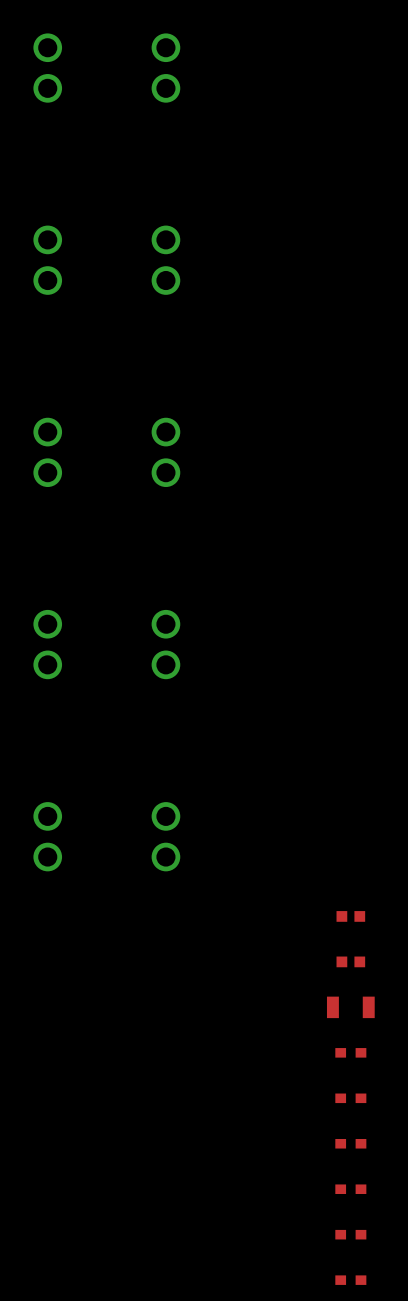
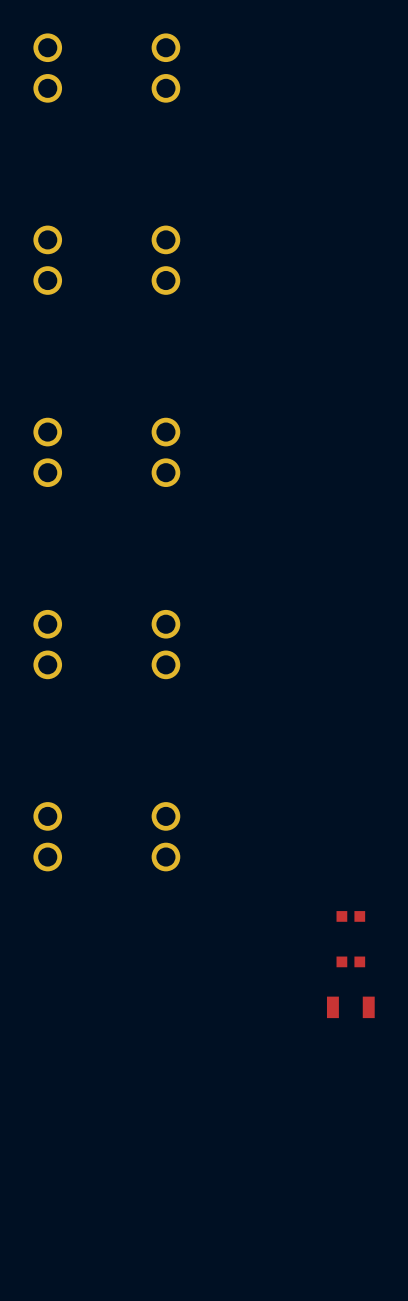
part: (350, 1052) -> none
part: (350, 1098) -> none
part: (350, 1143) -> none
part: (350, 1189) -> none
part: (350, 1234) -> none
part: (350, 1280) -> none

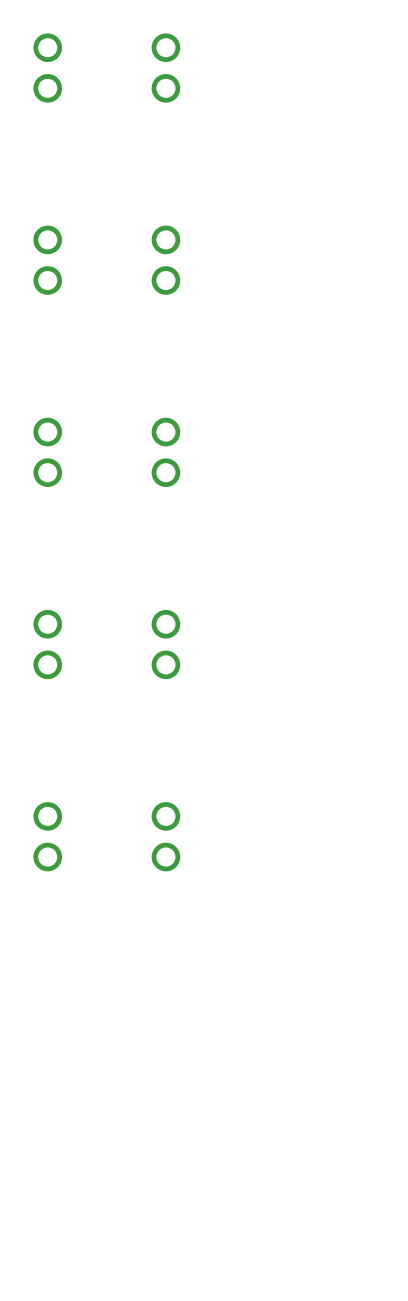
part: (350, 916) -> none
part: (350, 961) -> none
part: (350, 1007) -> none

